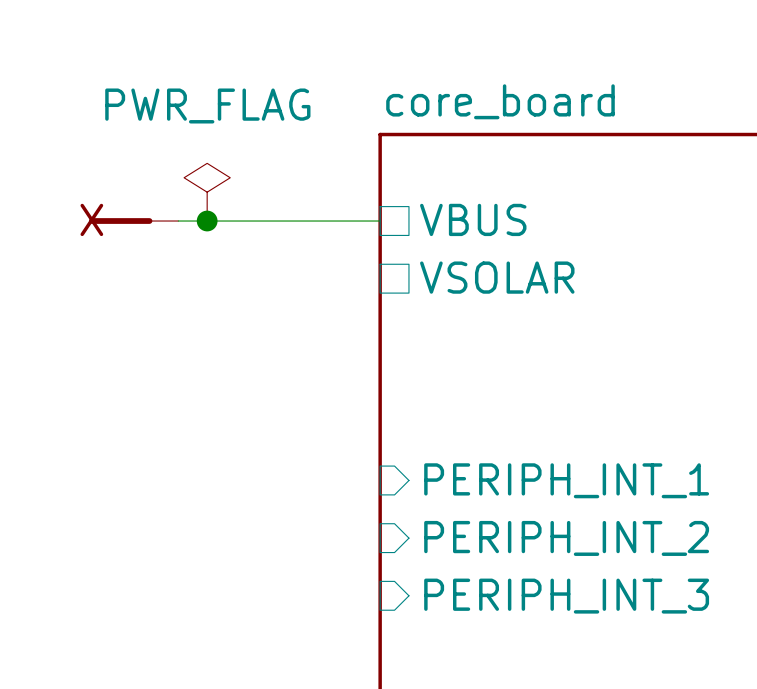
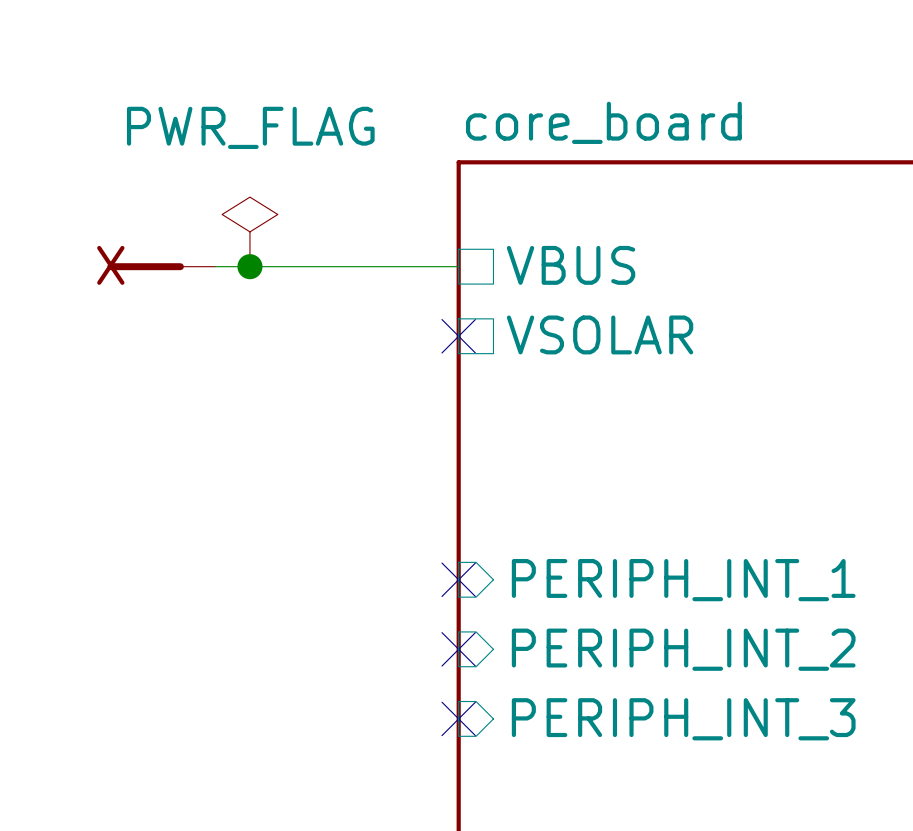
no-connect mark: none -> (458, 336)
no-connect mark: none -> (458, 579)
no-connect mark: none -> (458, 649)
no-connect mark: none -> (458, 718)

